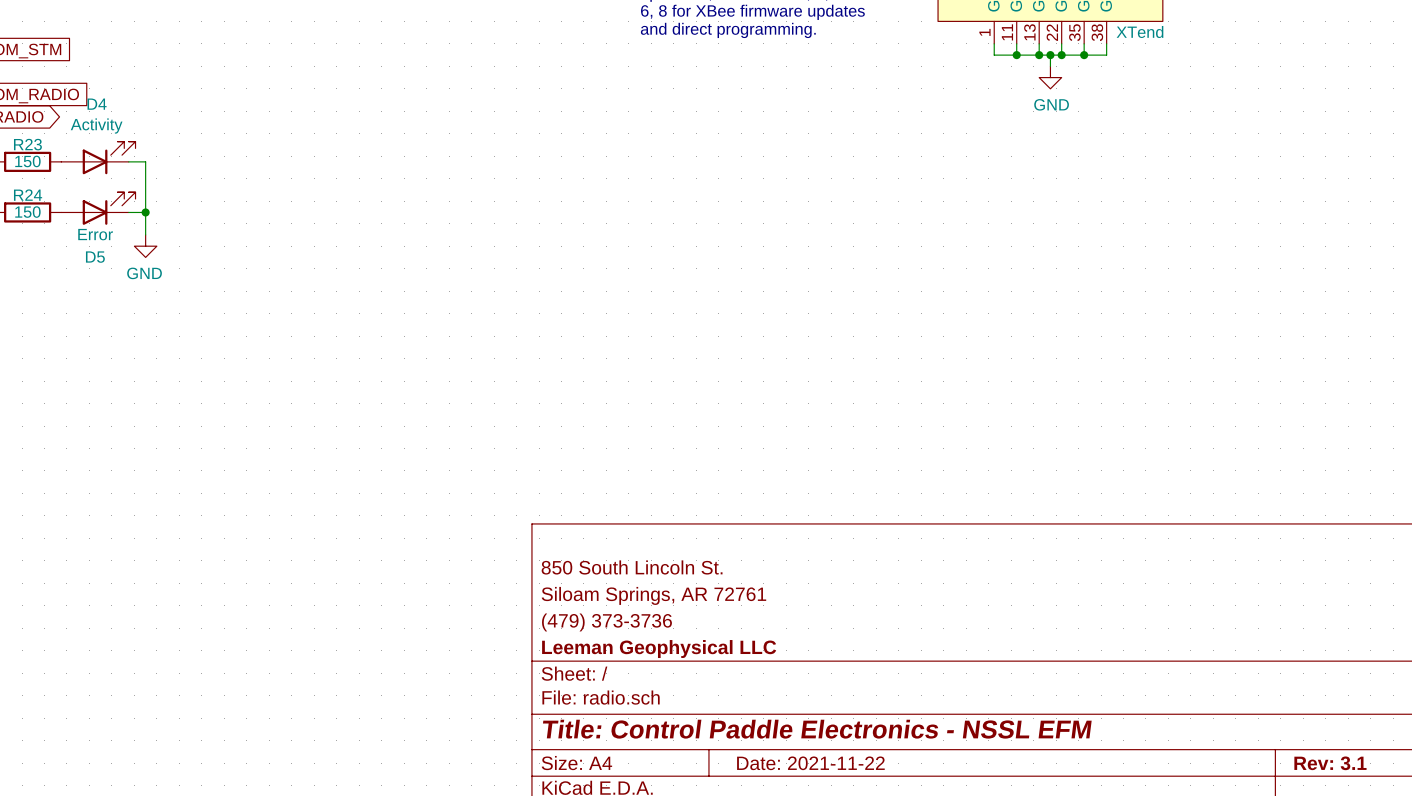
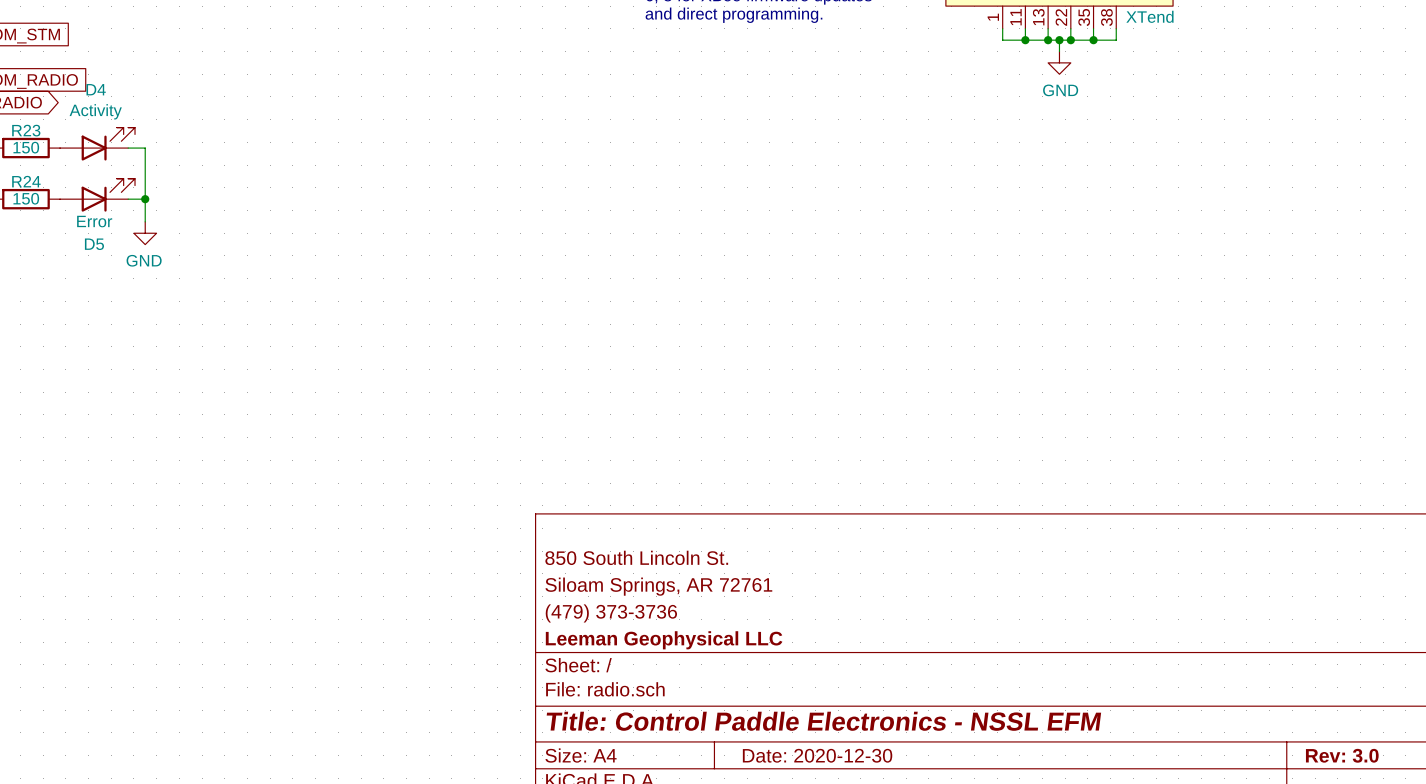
title block: Date: 2021-11-22 (810, 763) -> Date: 2020-12-30 (817, 755)
title block: Rev: 3.1 (1330, 763) -> Rev: 3.0 (1342, 755)

